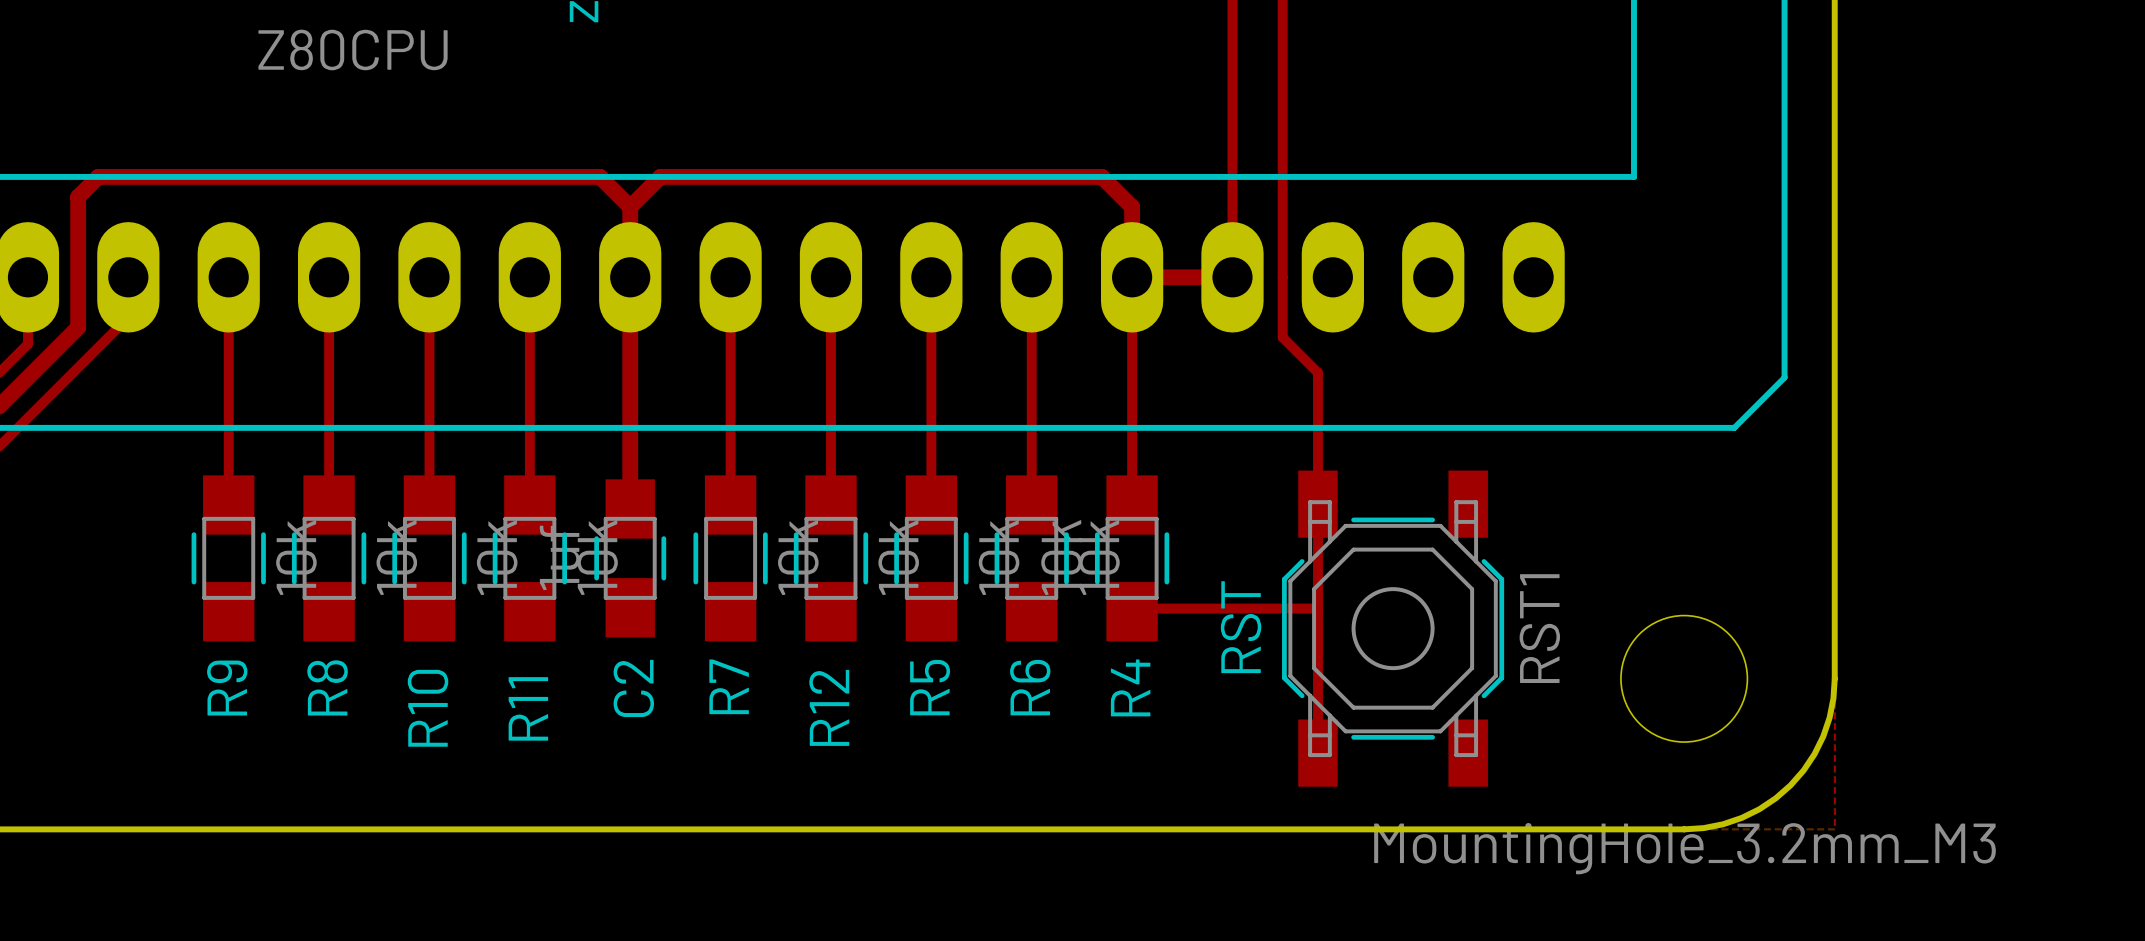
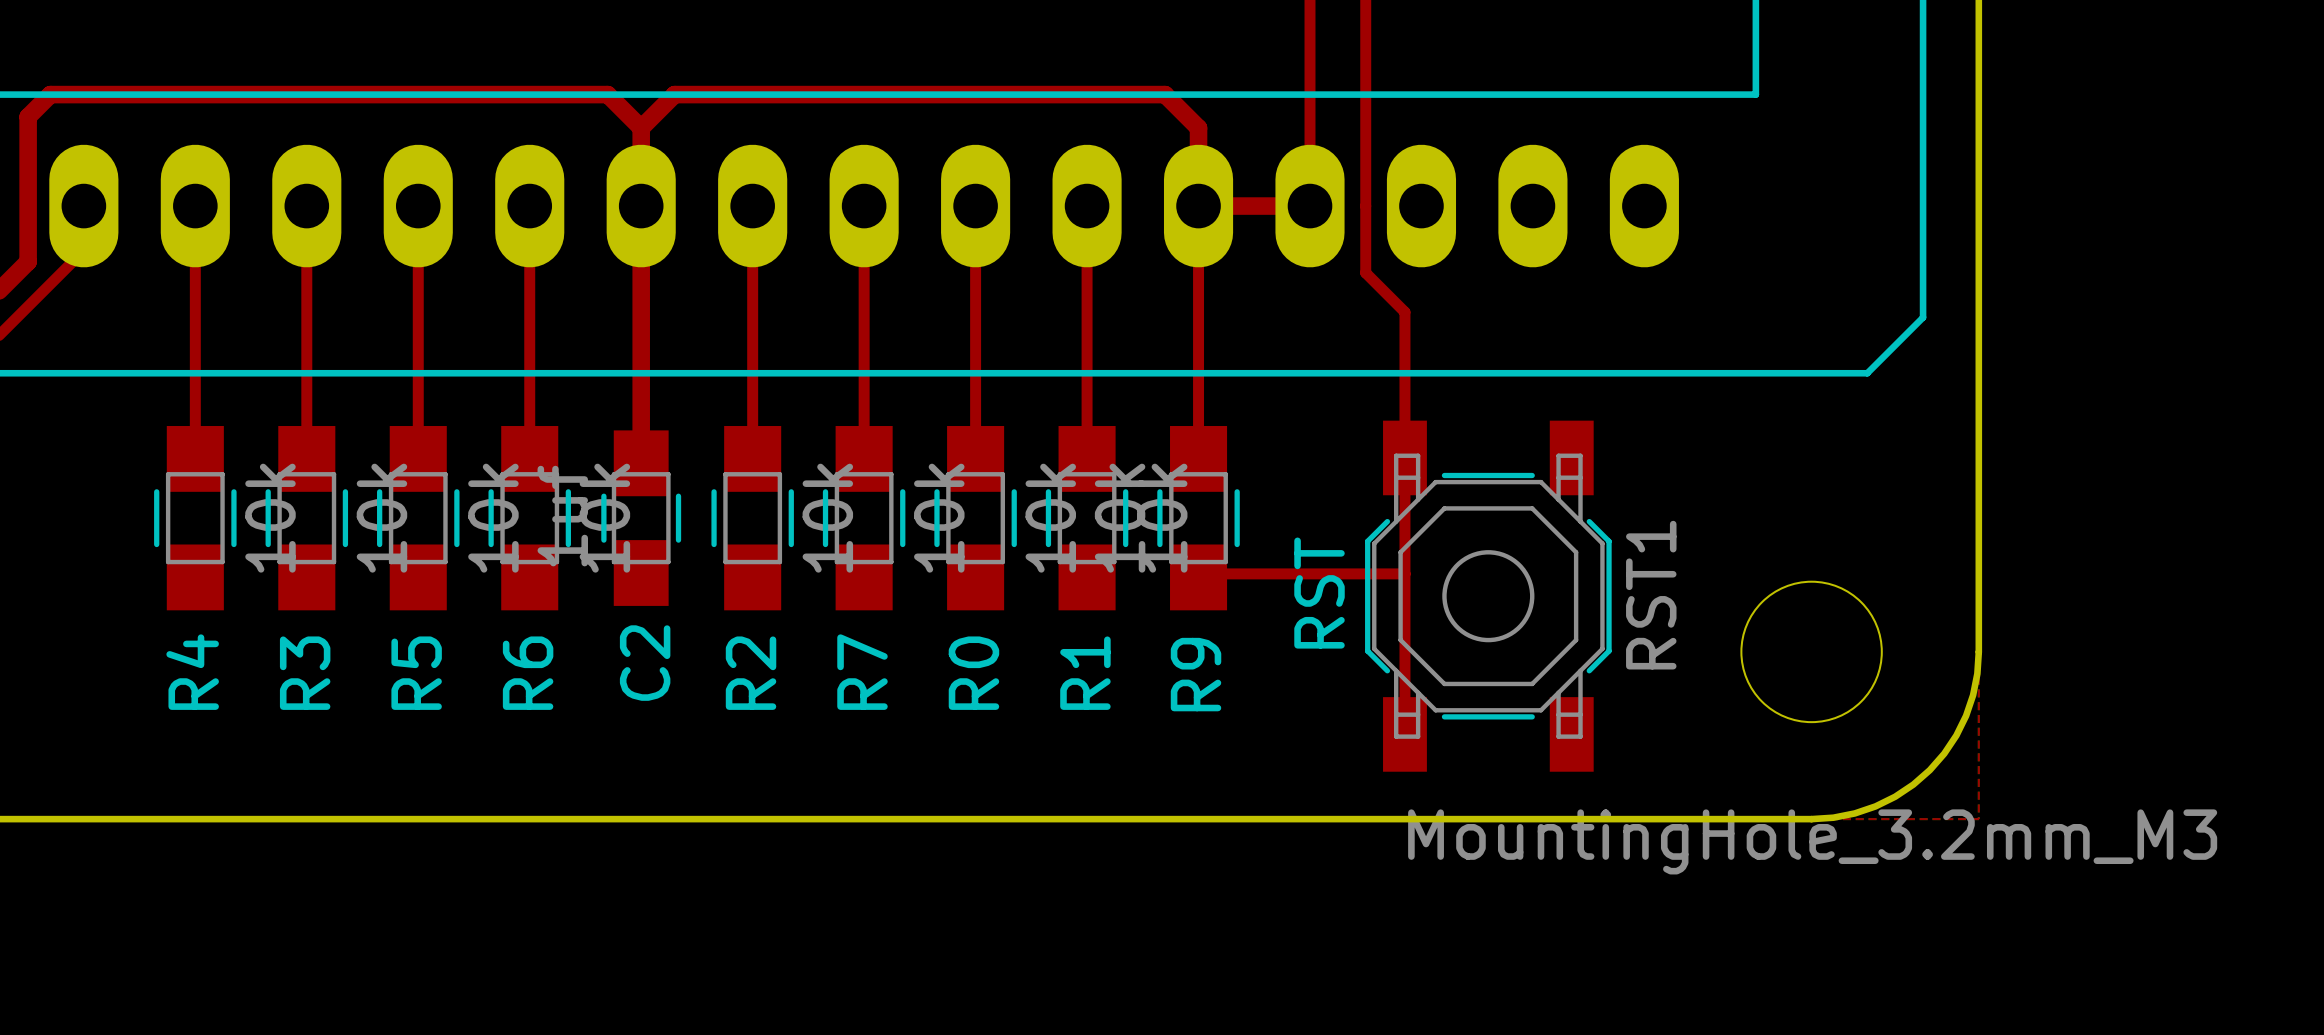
R7 name: R7 (729, 686) -> R2 (751, 673)
R8 name: R8 (327, 687) -> R3 (305, 673)
R5 name: R5 (930, 687) -> R0 (973, 673)
R6 name: R6 (1030, 687) -> R1 (1085, 673)
R4 name: R4 (1130, 687) -> R9 (1196, 674)
R9 name: R9 (227, 688) -> R4 (192, 672)
R12 name: R12 (829, 707) -> R7 (862, 672)
R10 name: R10 (428, 708) -> R5 (416, 673)
R11 name: R11 (528, 708) -> R6 (528, 673)

